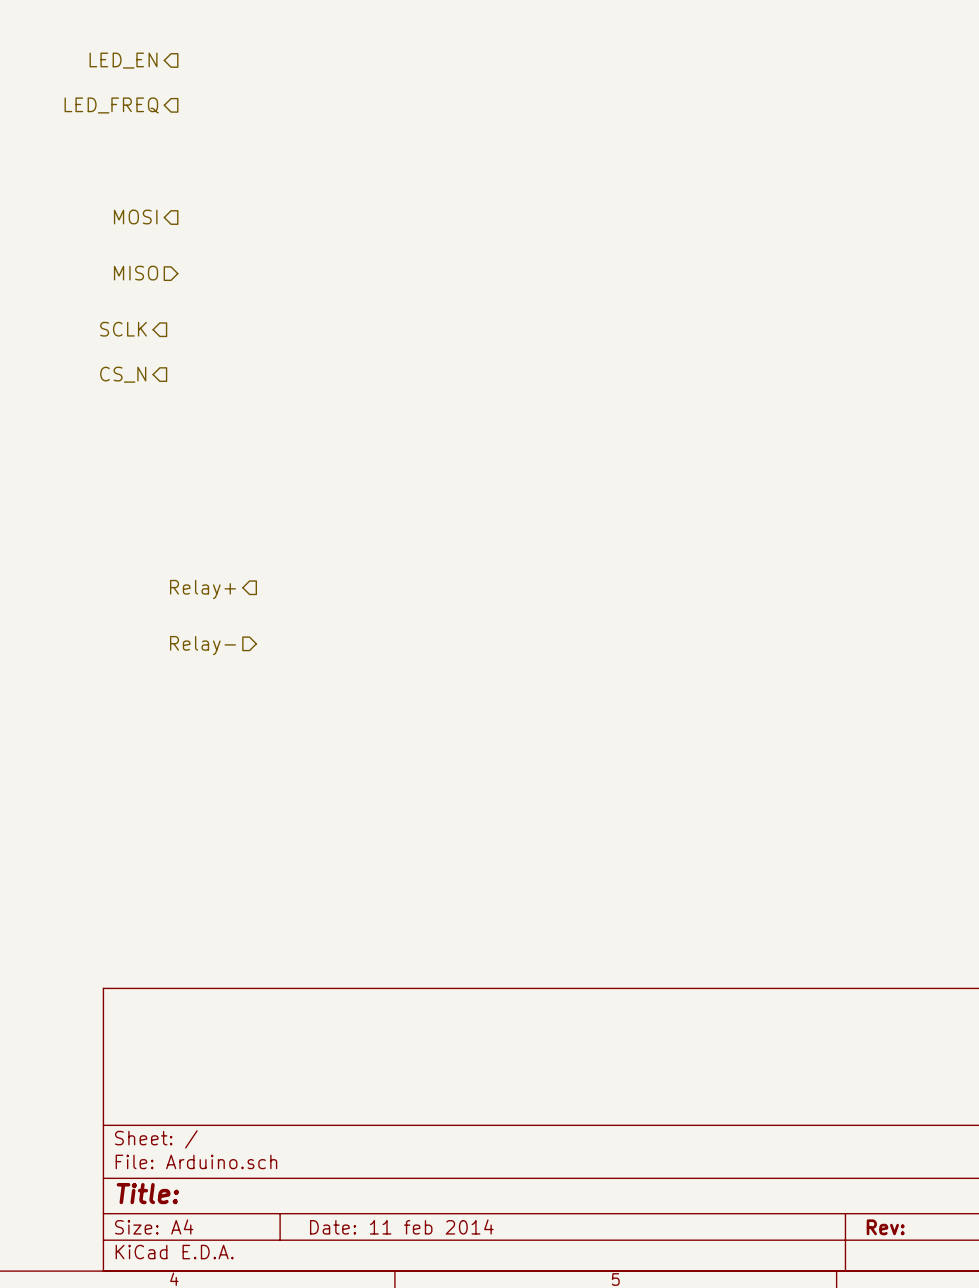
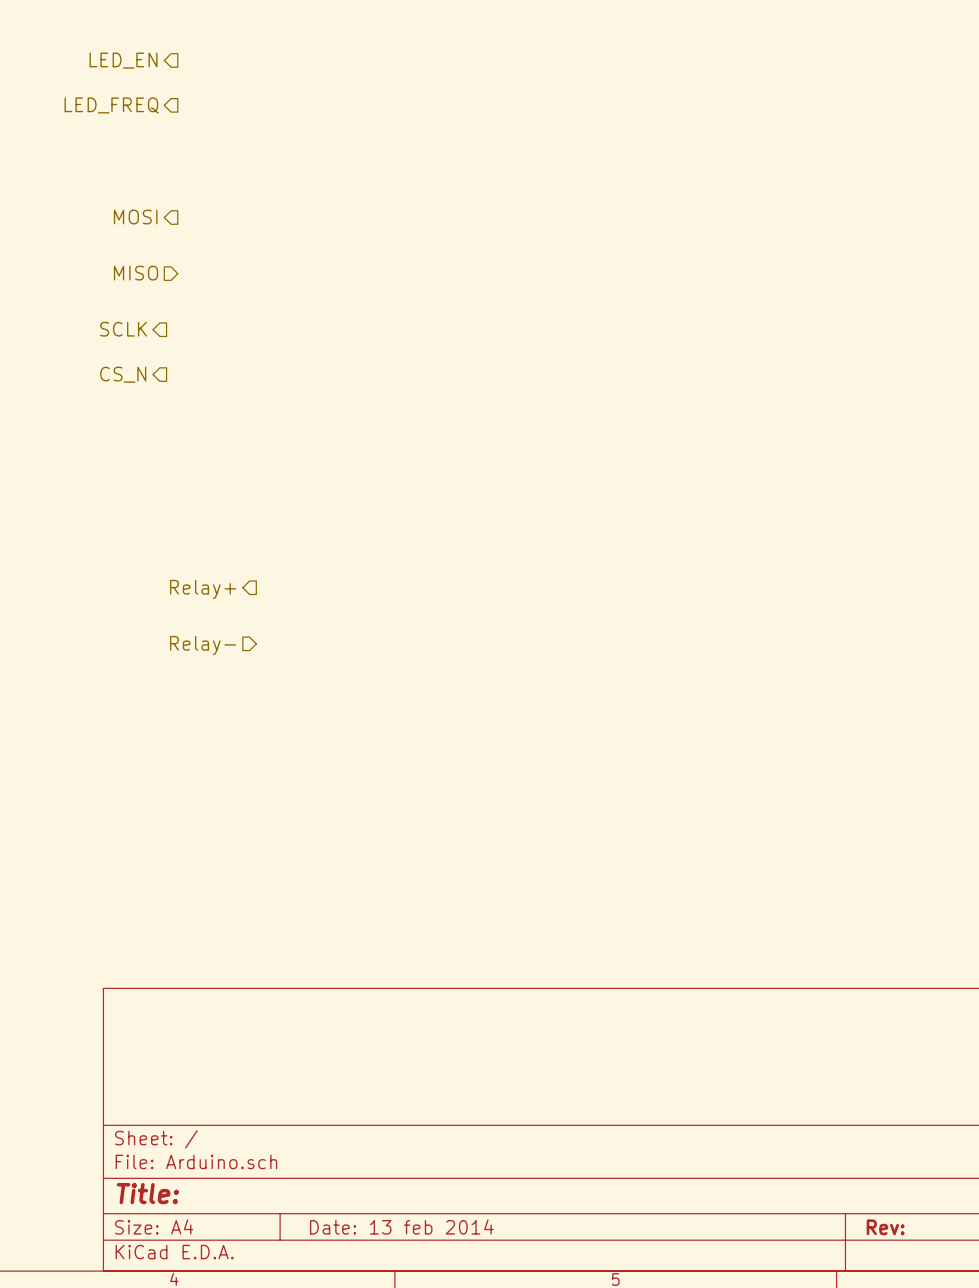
title block: Date: 11 feb 2014 (401, 1227) -> Date: 13 feb 2014 (401, 1227)

